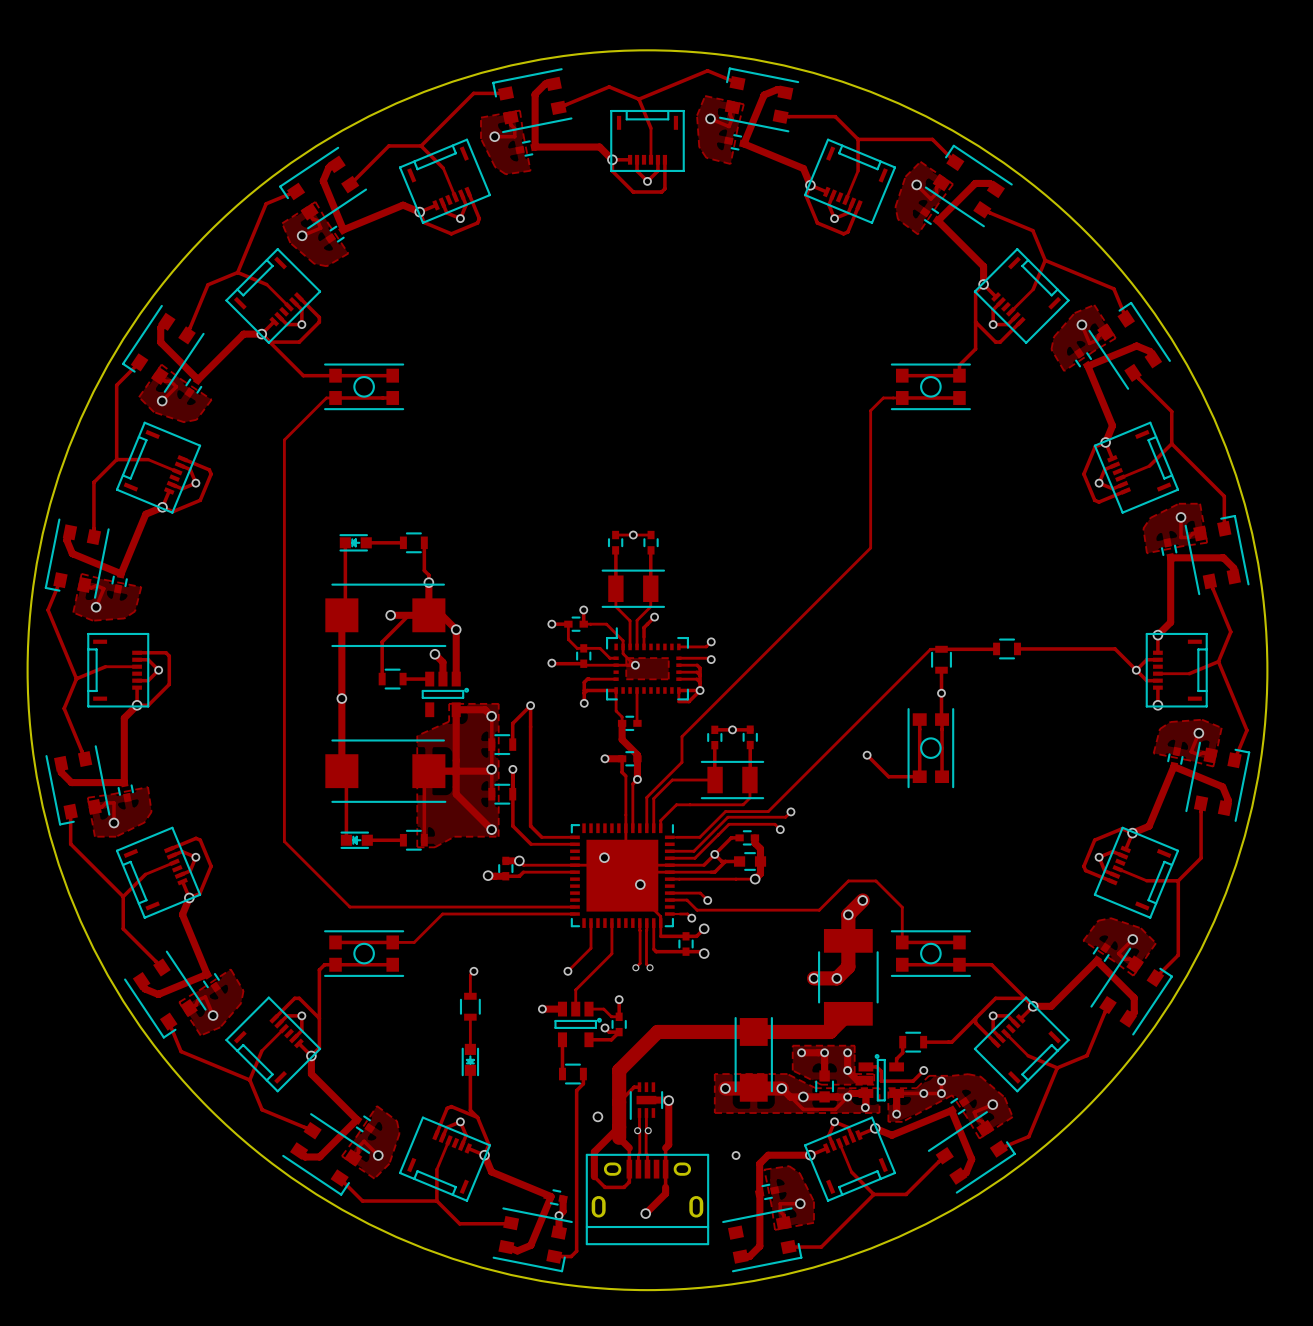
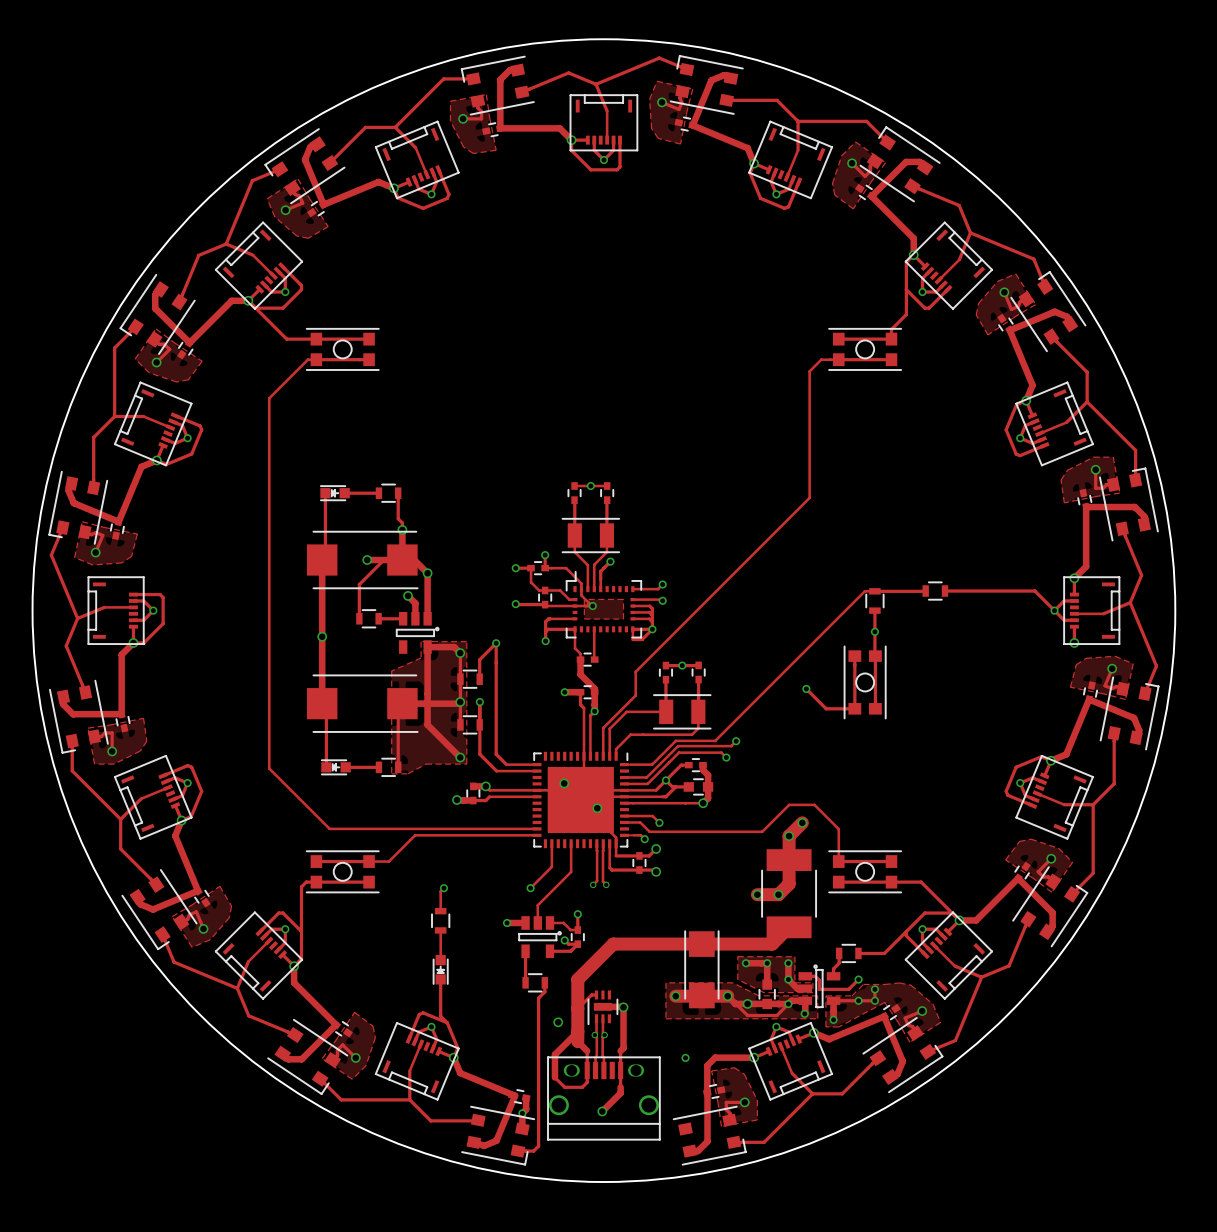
part footprint: [585, 1153, 710, 1246] -> [547, 1056, 661, 1141]

